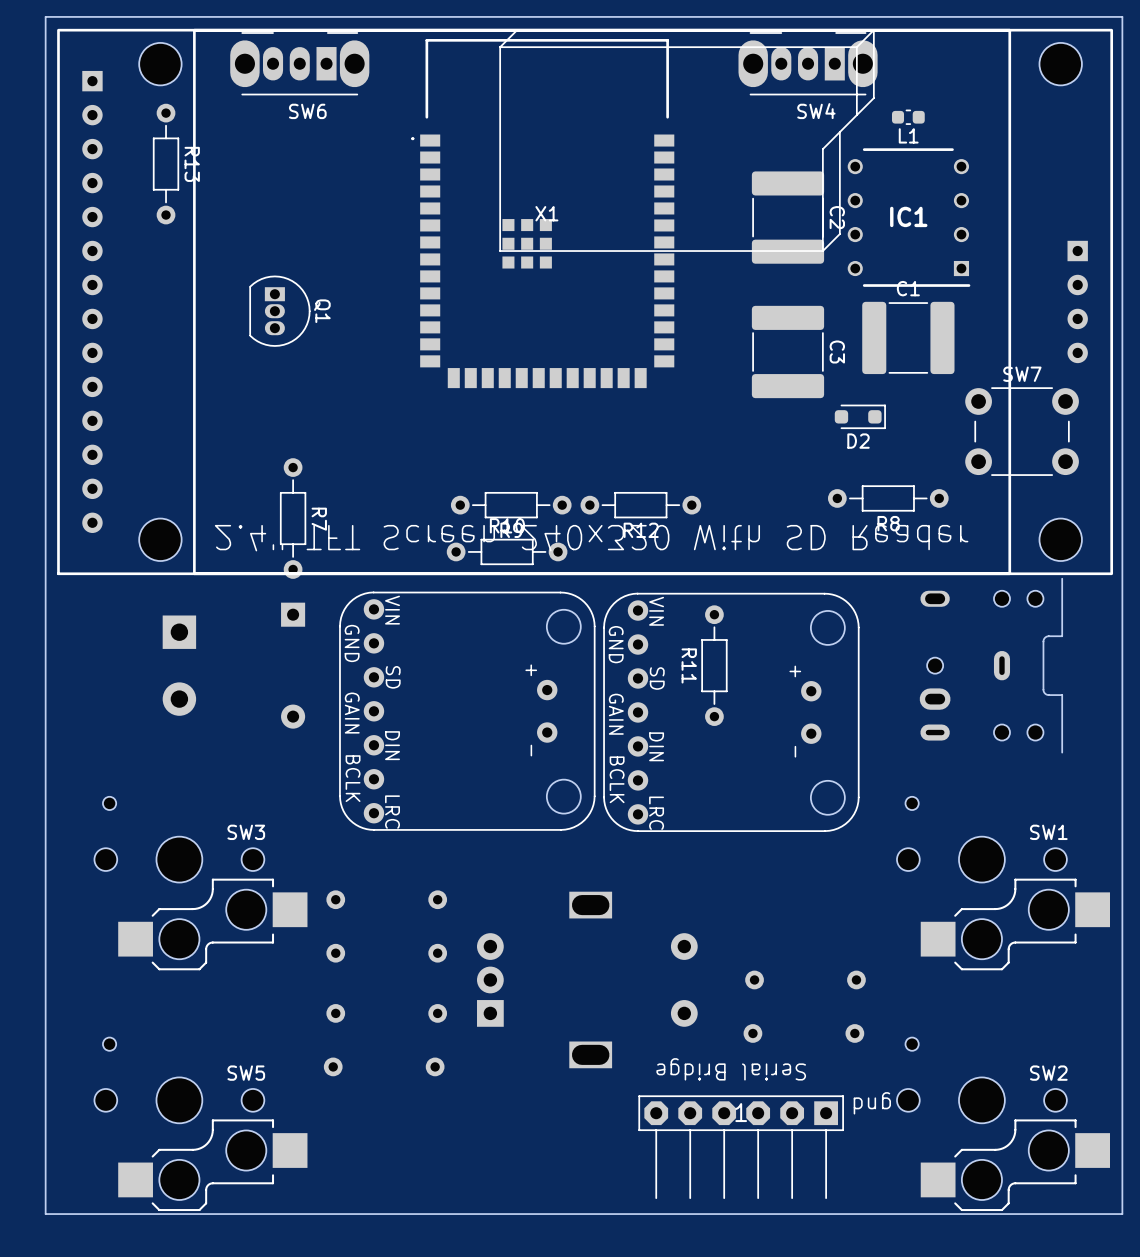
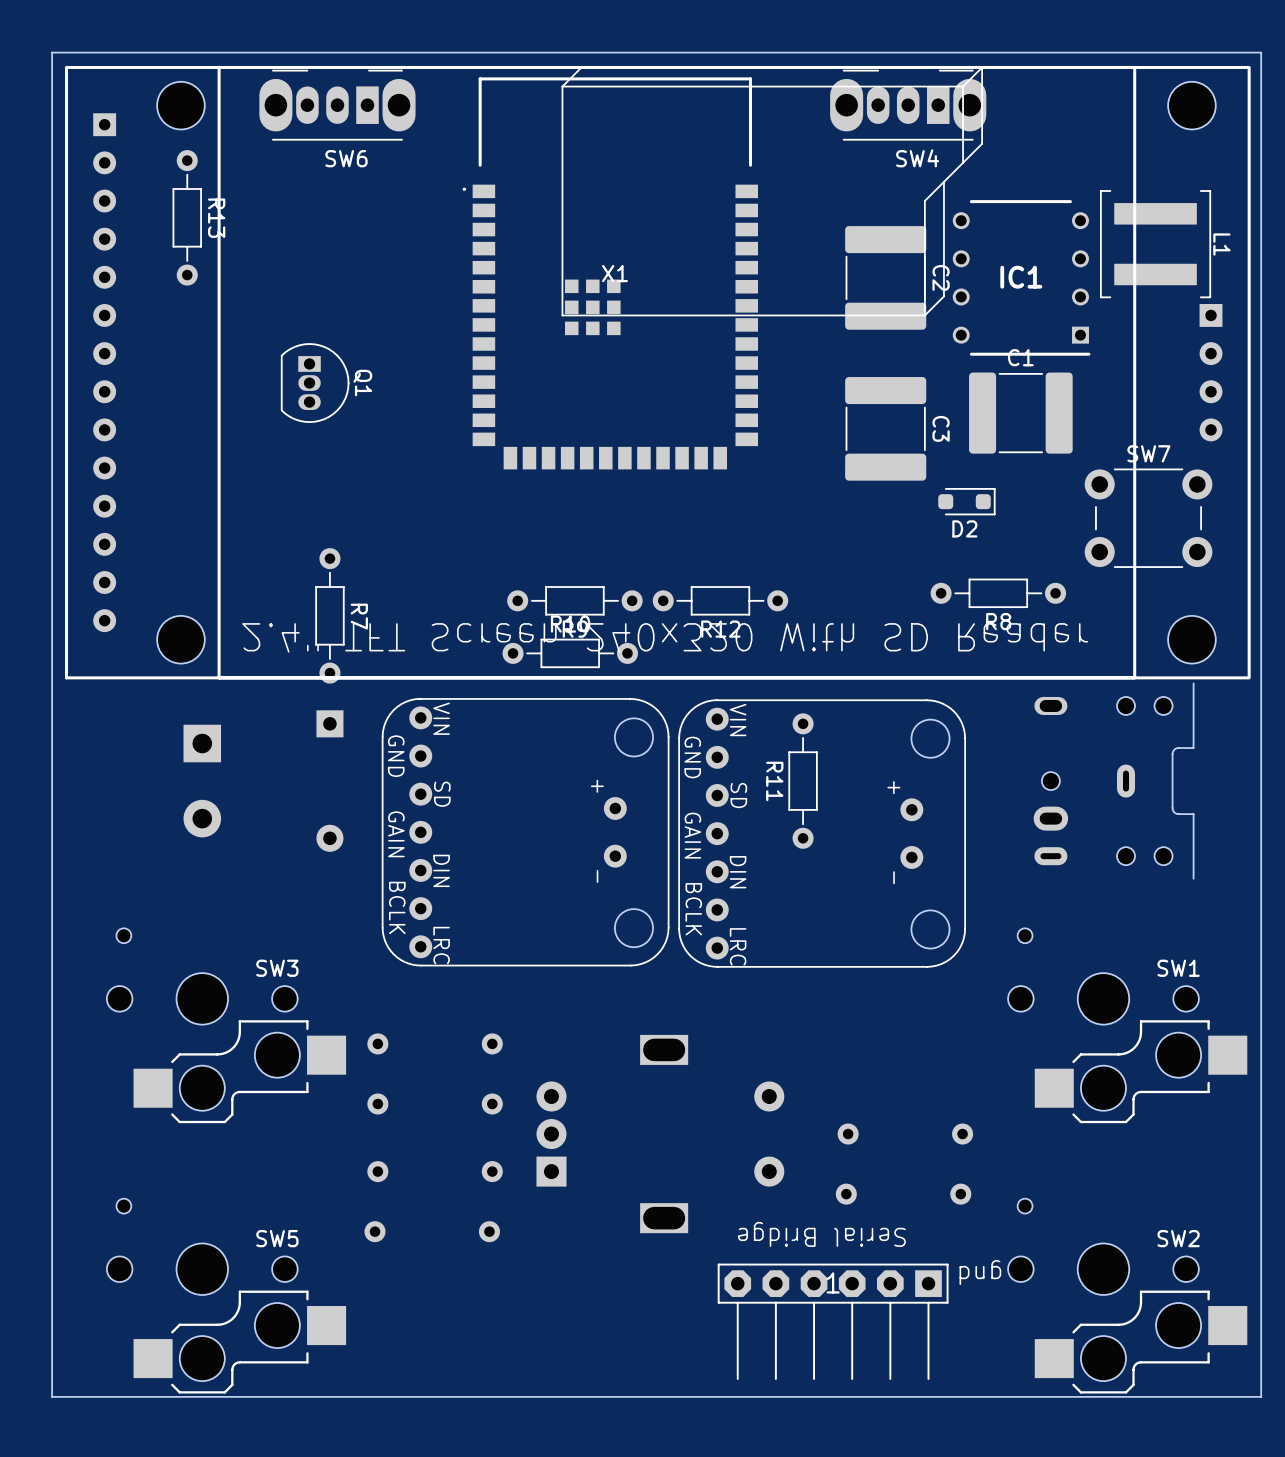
L1 footprint: [891, 109, 925, 125] -> [1099, 190, 1212, 299]
L1 name position: L1 (908, 135) -> L1 (1221, 244)

